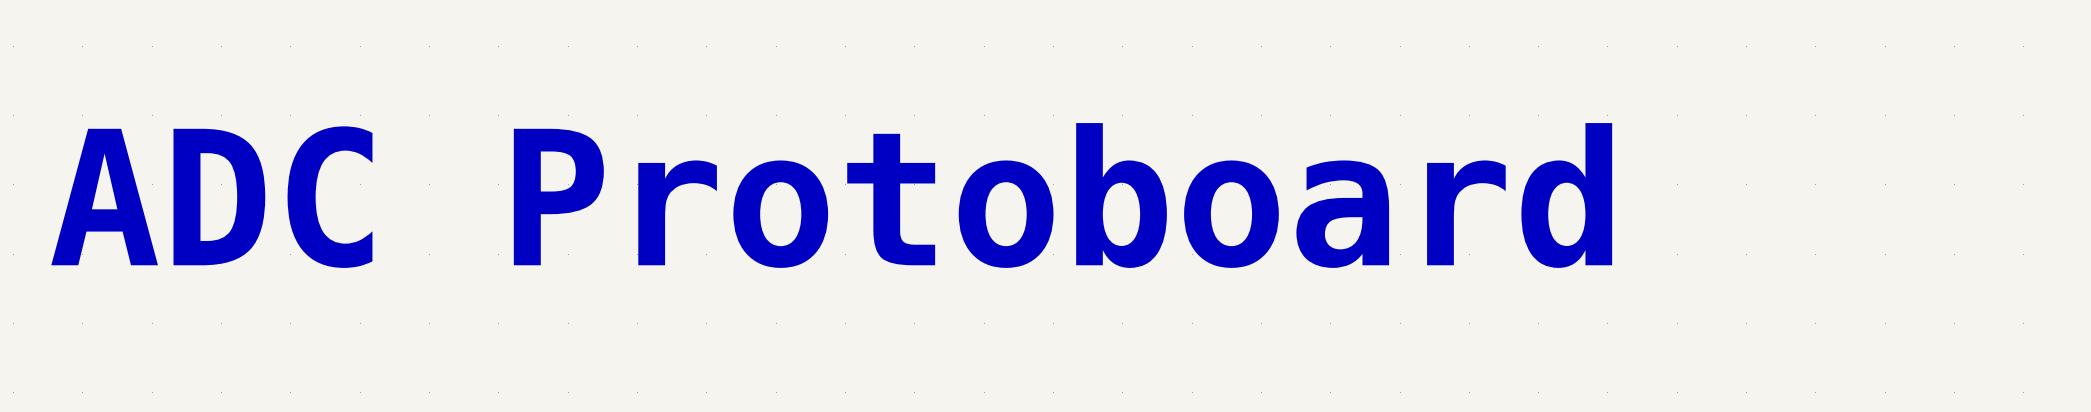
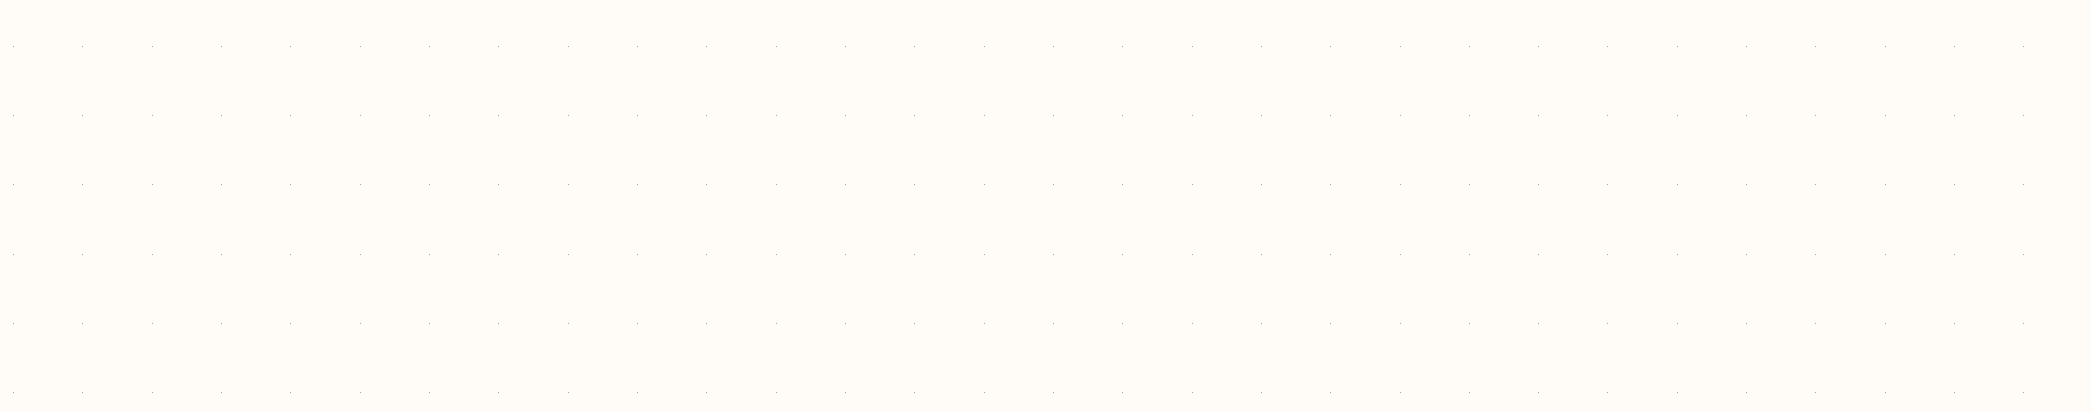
text: ADC Protoboard (831, 195) -> none

